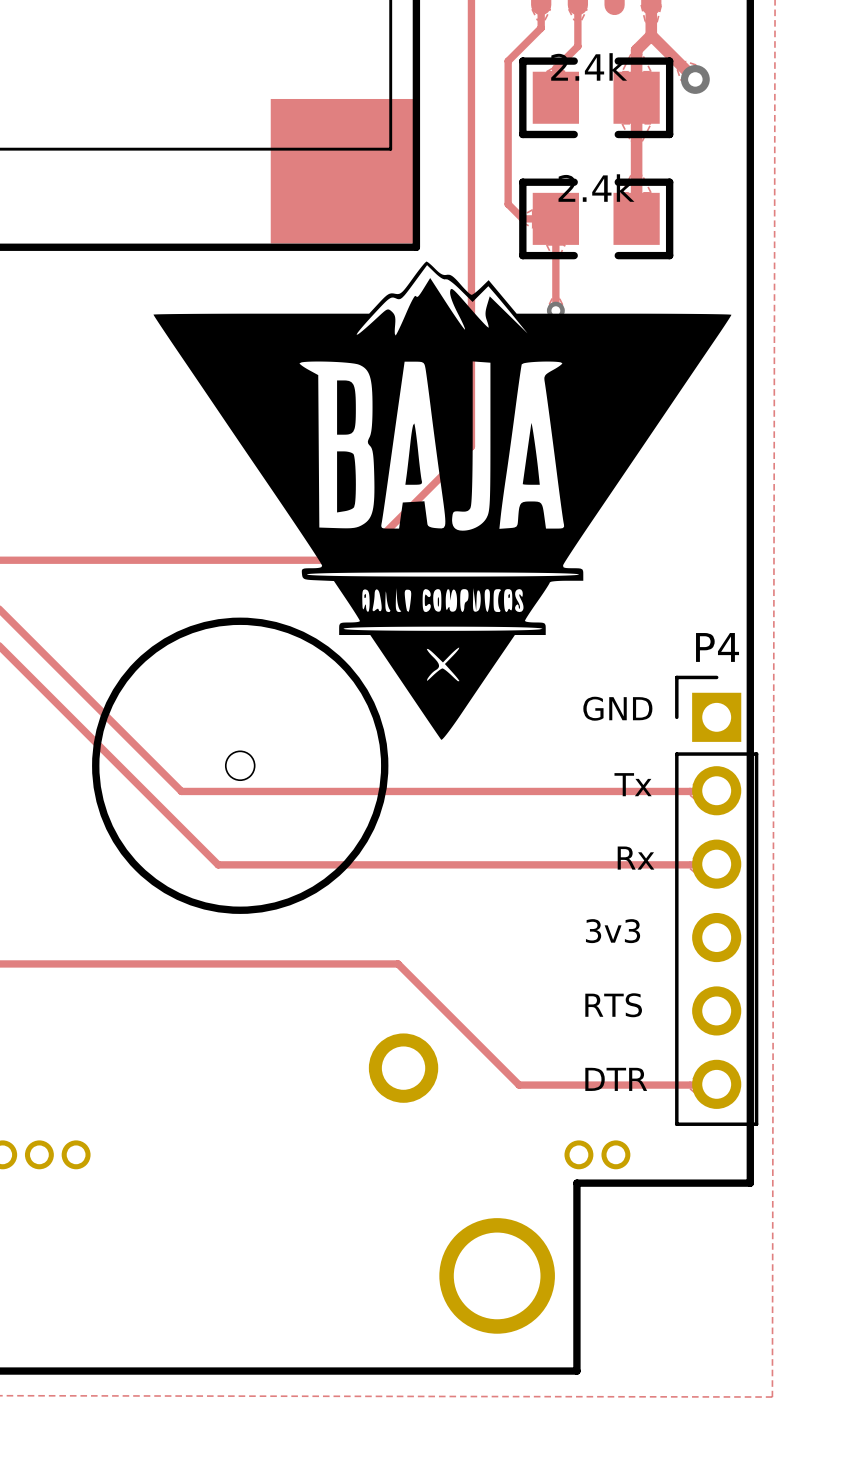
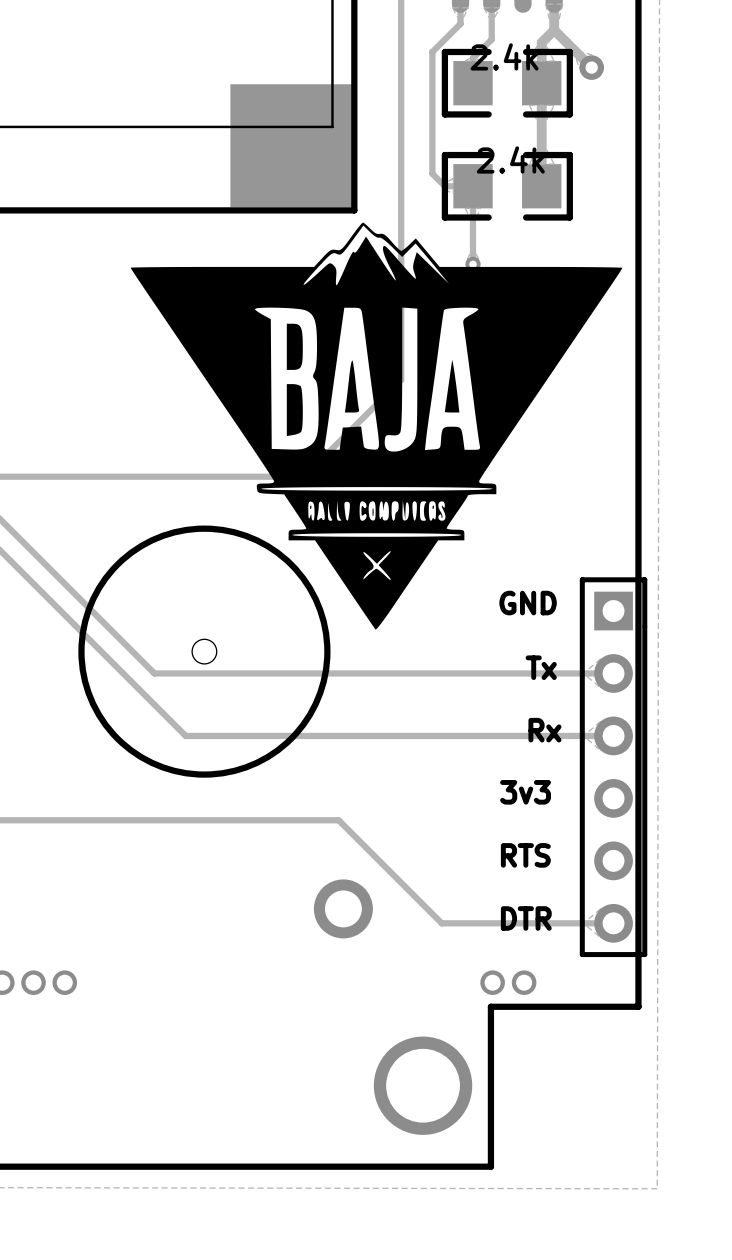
P4: (716, 900) -> none
part: none -> (613, 767)

